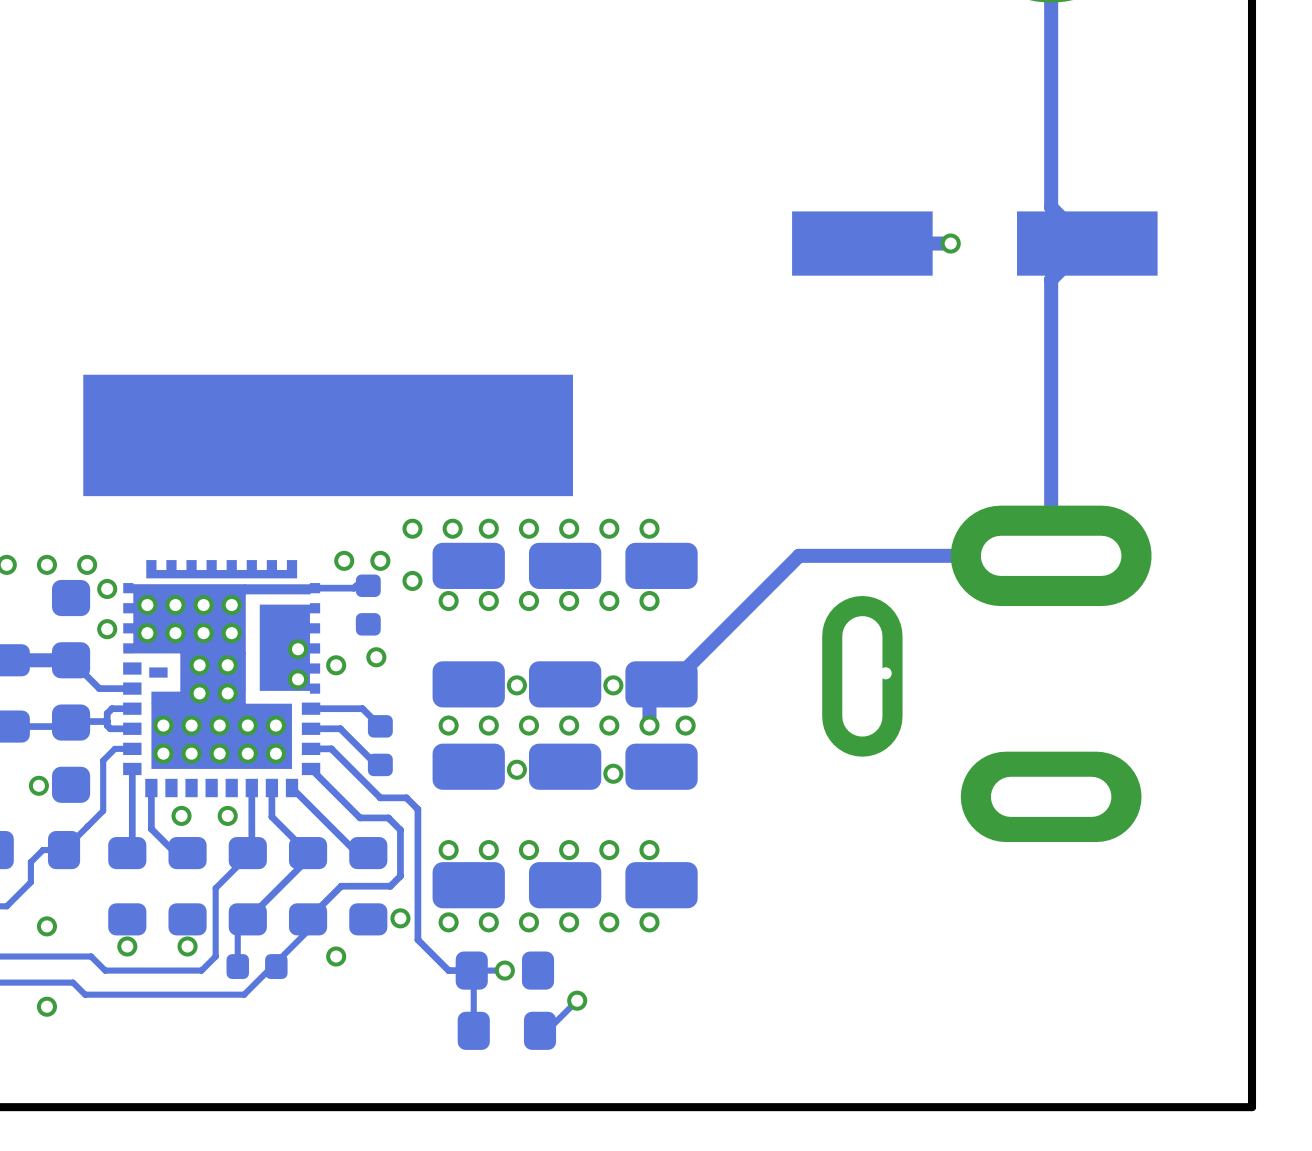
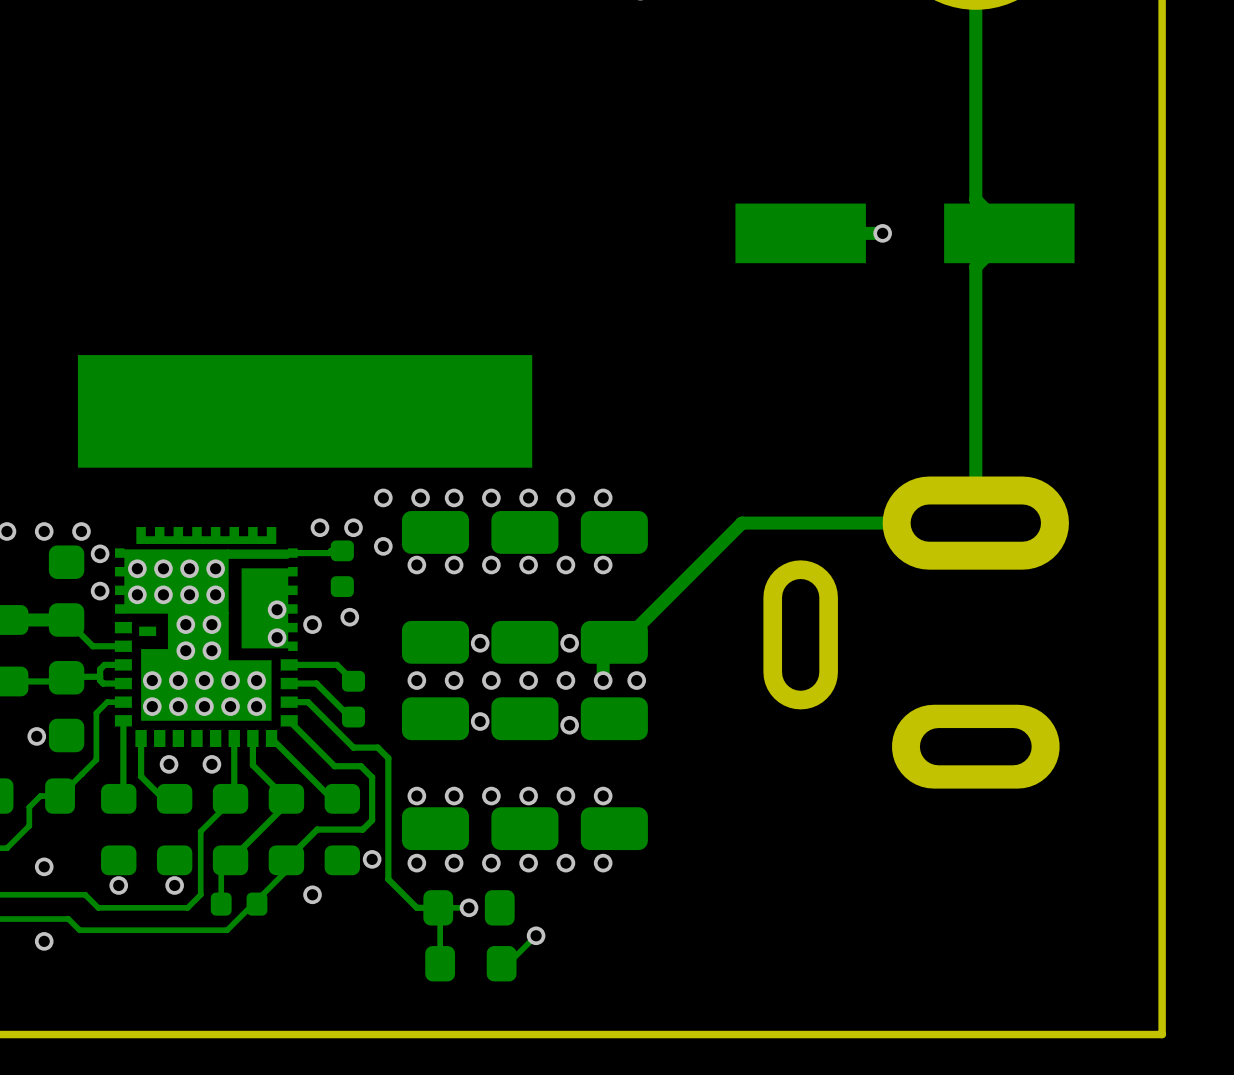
via: (885, 673) -> none

